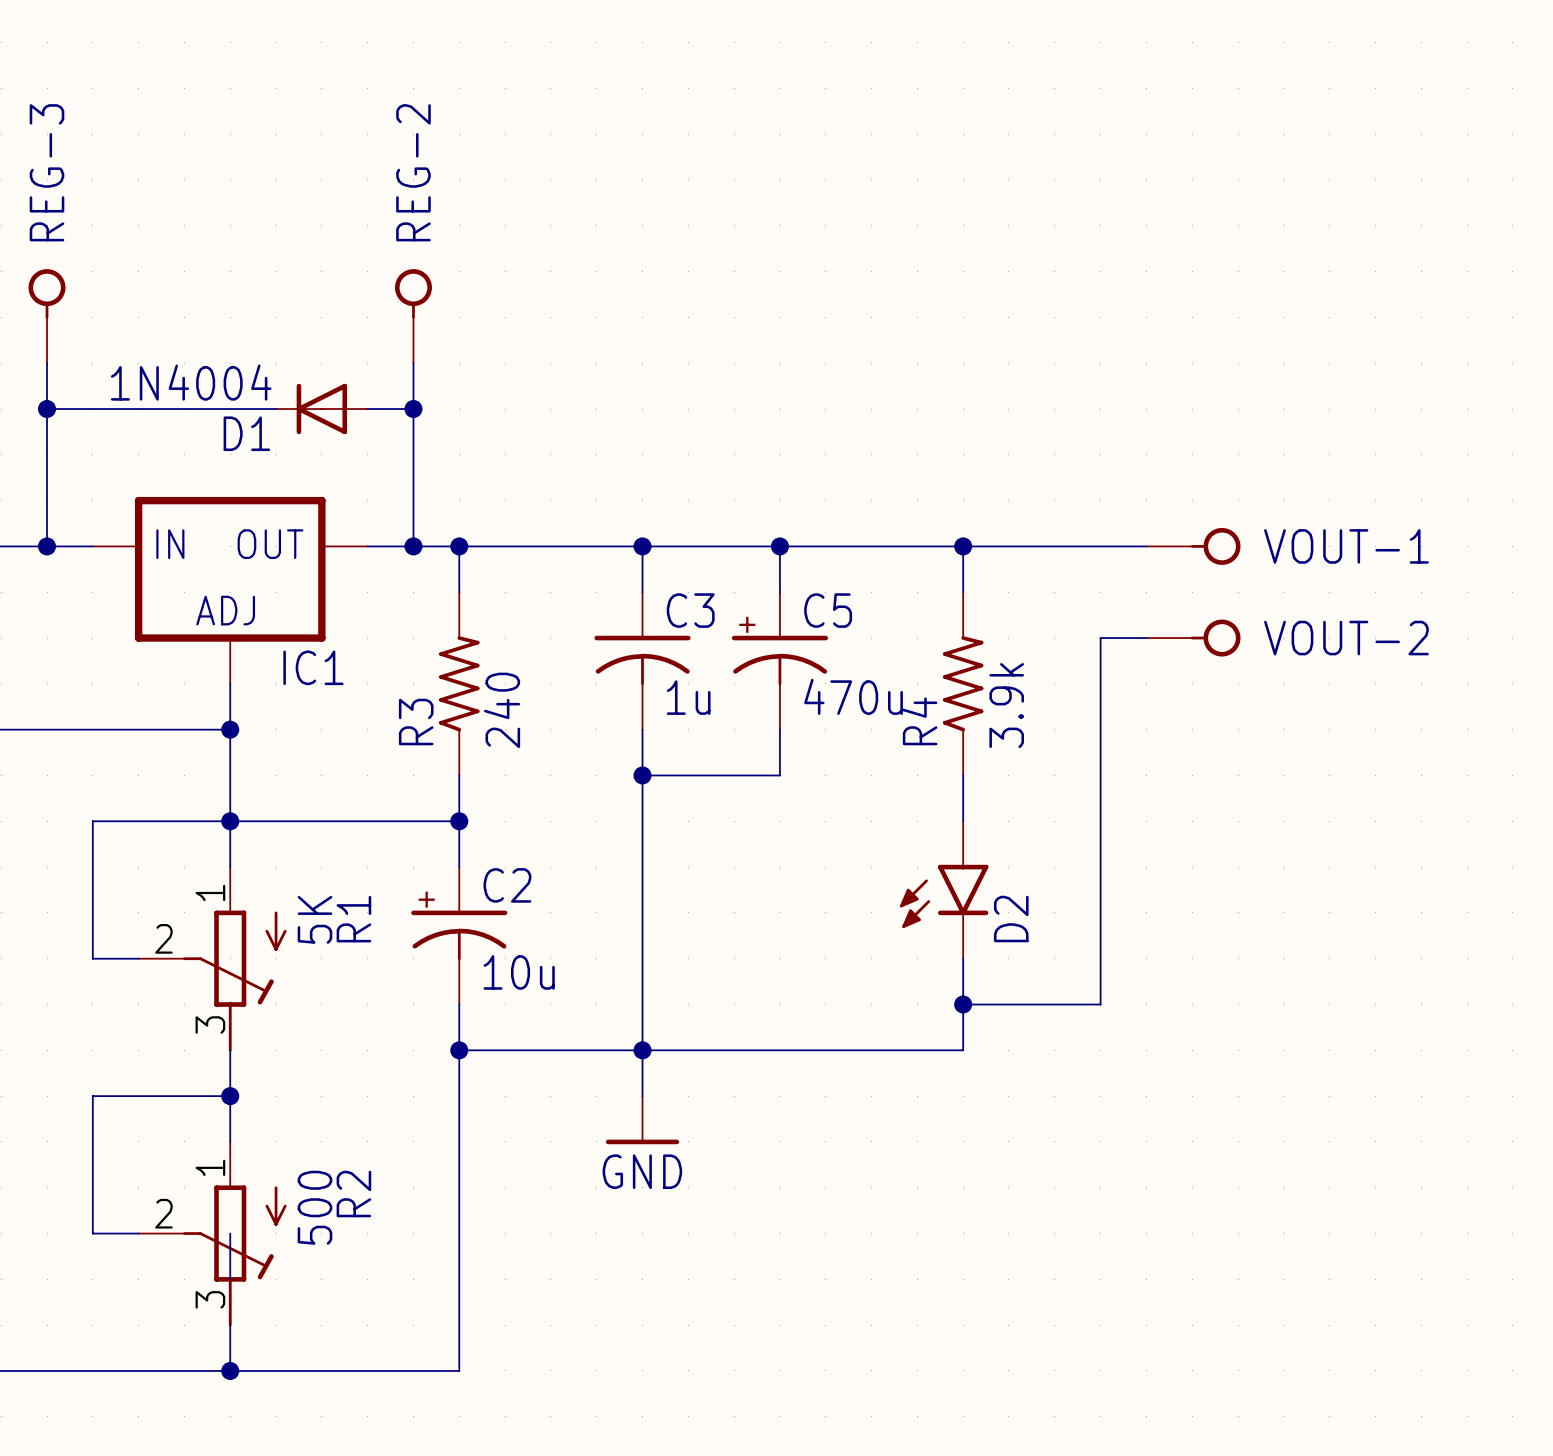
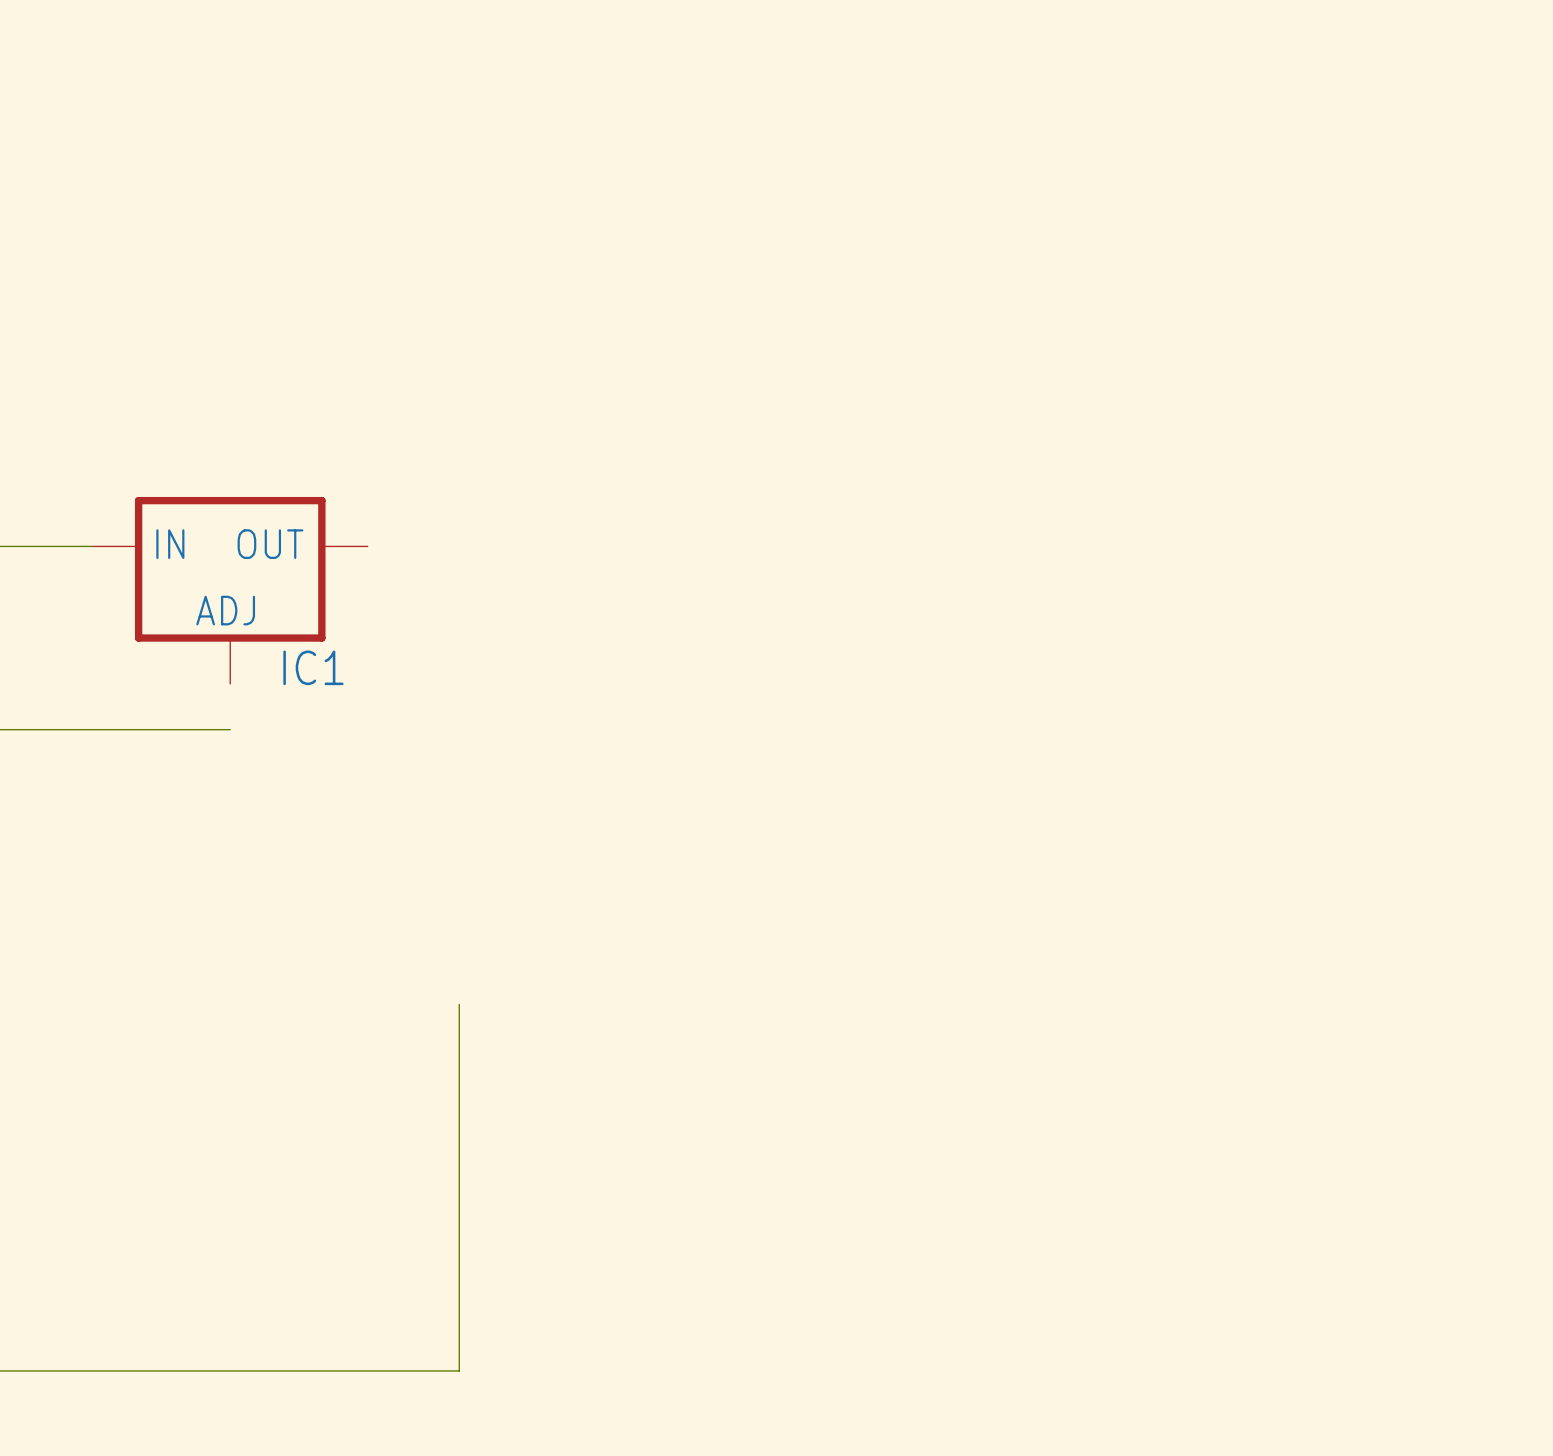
REG-3: (47, 316) -> none
REG-2: (413, 316) -> none
wire: (47, 363) (47, 546) -> none
wire: (413, 363) (413, 546) -> none
wire: (47, 409) (276, 409) -> none
junction: (47, 409) -> none
D1: 1N4004 (321, 409) -> none
wire: (367, 409) (413, 409) -> none
junction: (413, 409) -> none
junction: (47, 546) -> none
wire: (367, 546) (1146, 546) -> none
junction: (413, 546) -> none
wire: (459, 546) (459, 592) -> none
junction: (459, 546) -> none
wire: (642, 546) (642, 592) -> none
junction: (642, 546) -> none
wire: (779, 546) (779, 592) -> none
junction: (779, 546) -> none
wire: (963, 546) (963, 592) -> none
junction: (963, 546) -> none
VOUT-1: (1193, 546) -> none
wire: (1146, 638) (1100, 638) (1100, 1004) (963, 1004) -> none
VOUT-2: (1193, 638) -> none
C3: 1u (642, 660) -> none
C5: 470u (779, 660) -> none
wire: (230, 683) (230, 867) -> none
R3: 240 (459, 683) -> none
R4: 3.9k (963, 683) -> none
junction: (230, 729) -> none
wire: (642, 729) (642, 1096) -> none
wire: (779, 729) (779, 775) (642, 775) -> none
wire: (459, 775) (459, 867) -> none
junction: (642, 775) -> none
wire: (963, 775) (963, 821) -> none
junction: (230, 821) -> none
wire: (459, 821) (92, 821) (92, 958) (138, 958) -> none
junction: (459, 821) -> none
D2: (944, 889) -> none
C2: 10u (459, 935) -> none
wire: (963, 958) (963, 1050) (459, 1050) -> none
R1: 5K (212, 959) -> none
junction: (963, 1004) -> none
wire: (230, 1050) (230, 1141) -> none
junction: (459, 1050) -> none
junction: (642, 1050) -> none
wire: (230, 1096) (92, 1096) (92, 1233) (138, 1233) -> none
junction: (230, 1096) -> none
power symbol: GND (642, 1120) -> none
wire: (230, 1233) (230, 1279) -> none
R2: 500 (212, 1234) -> none
wire: (230, 1325) (230, 1370) -> none
junction: (230, 1370) -> none

